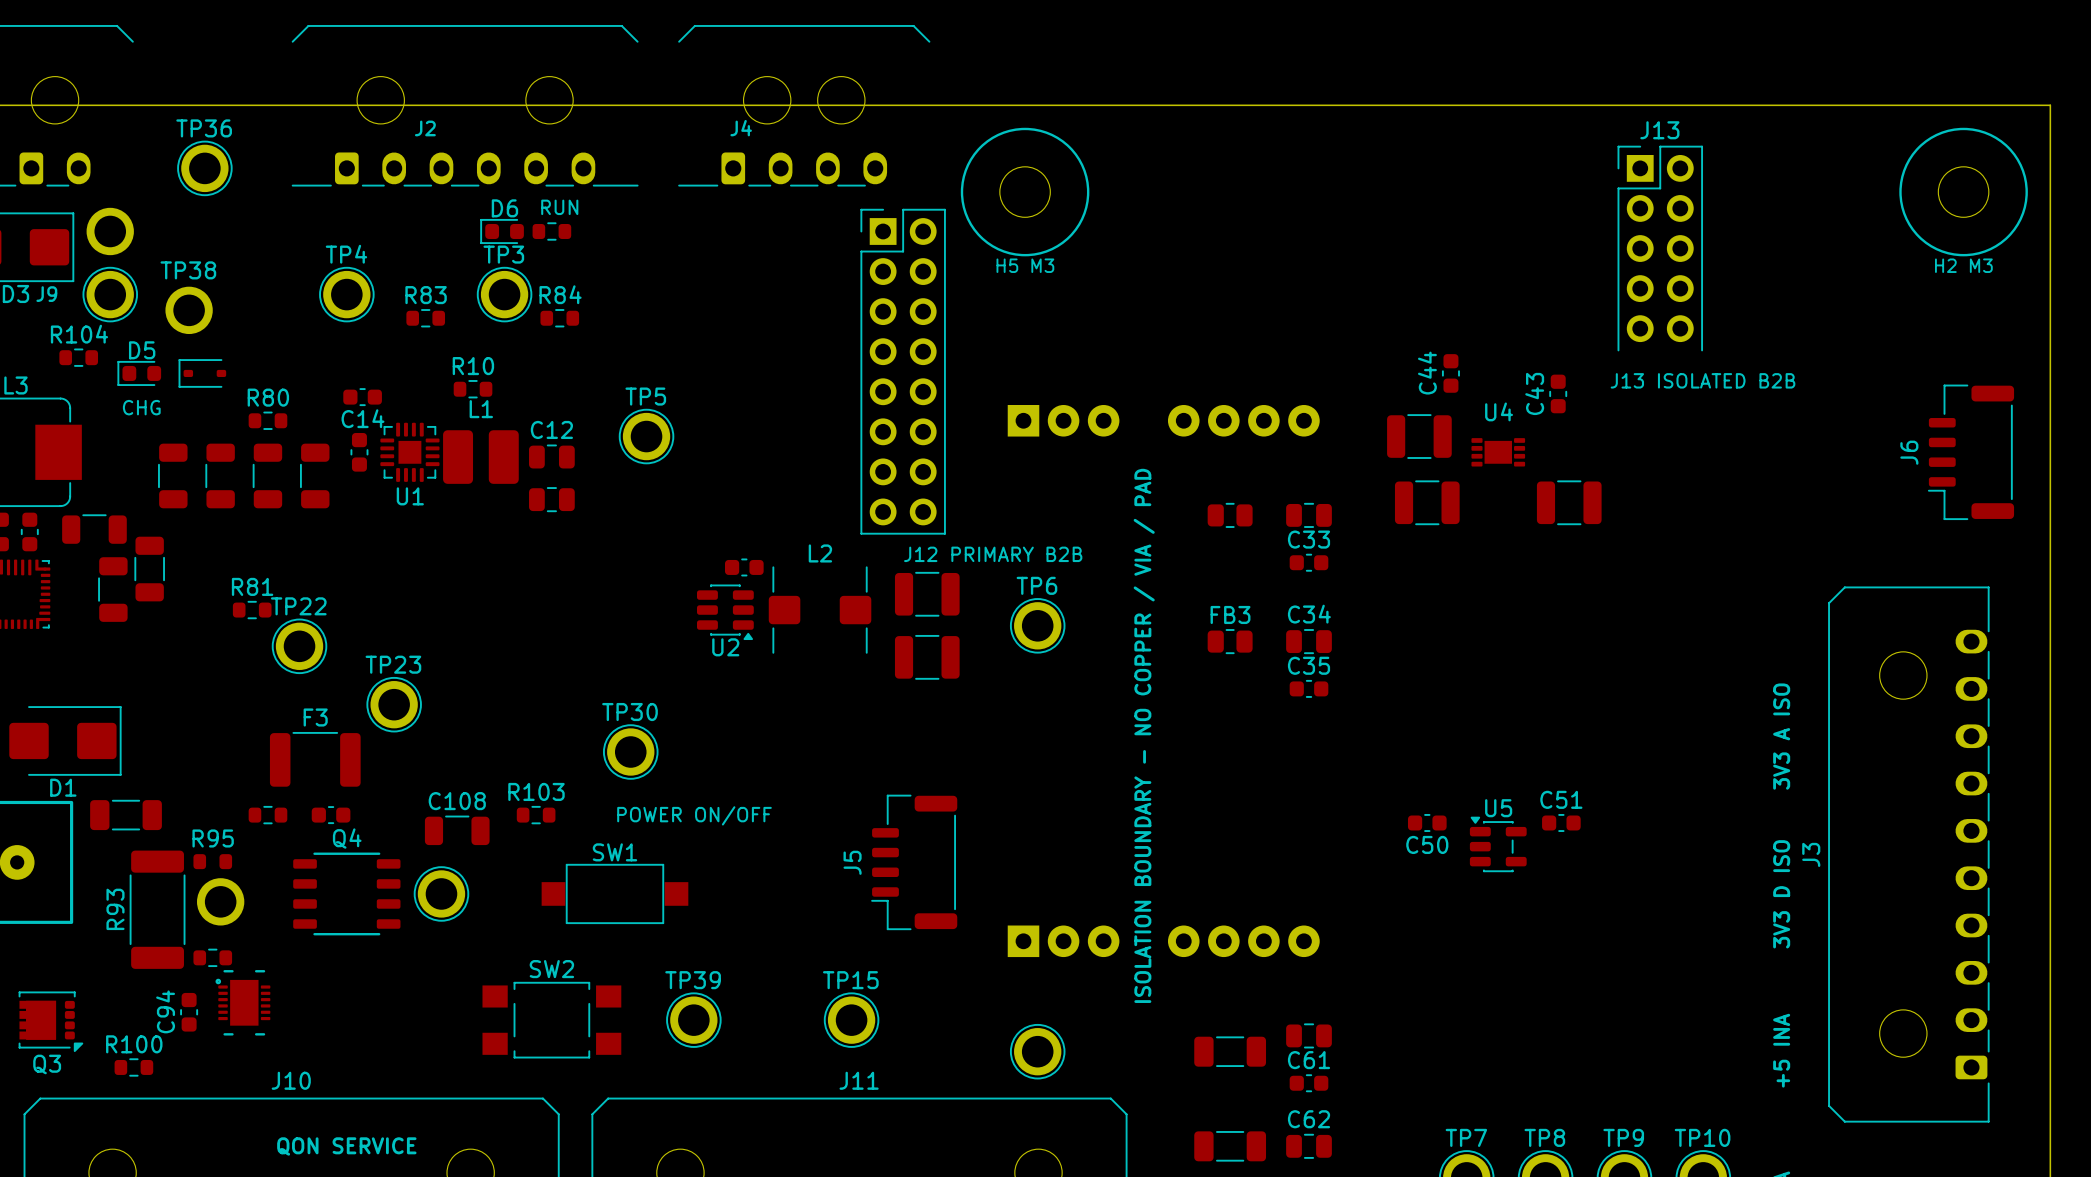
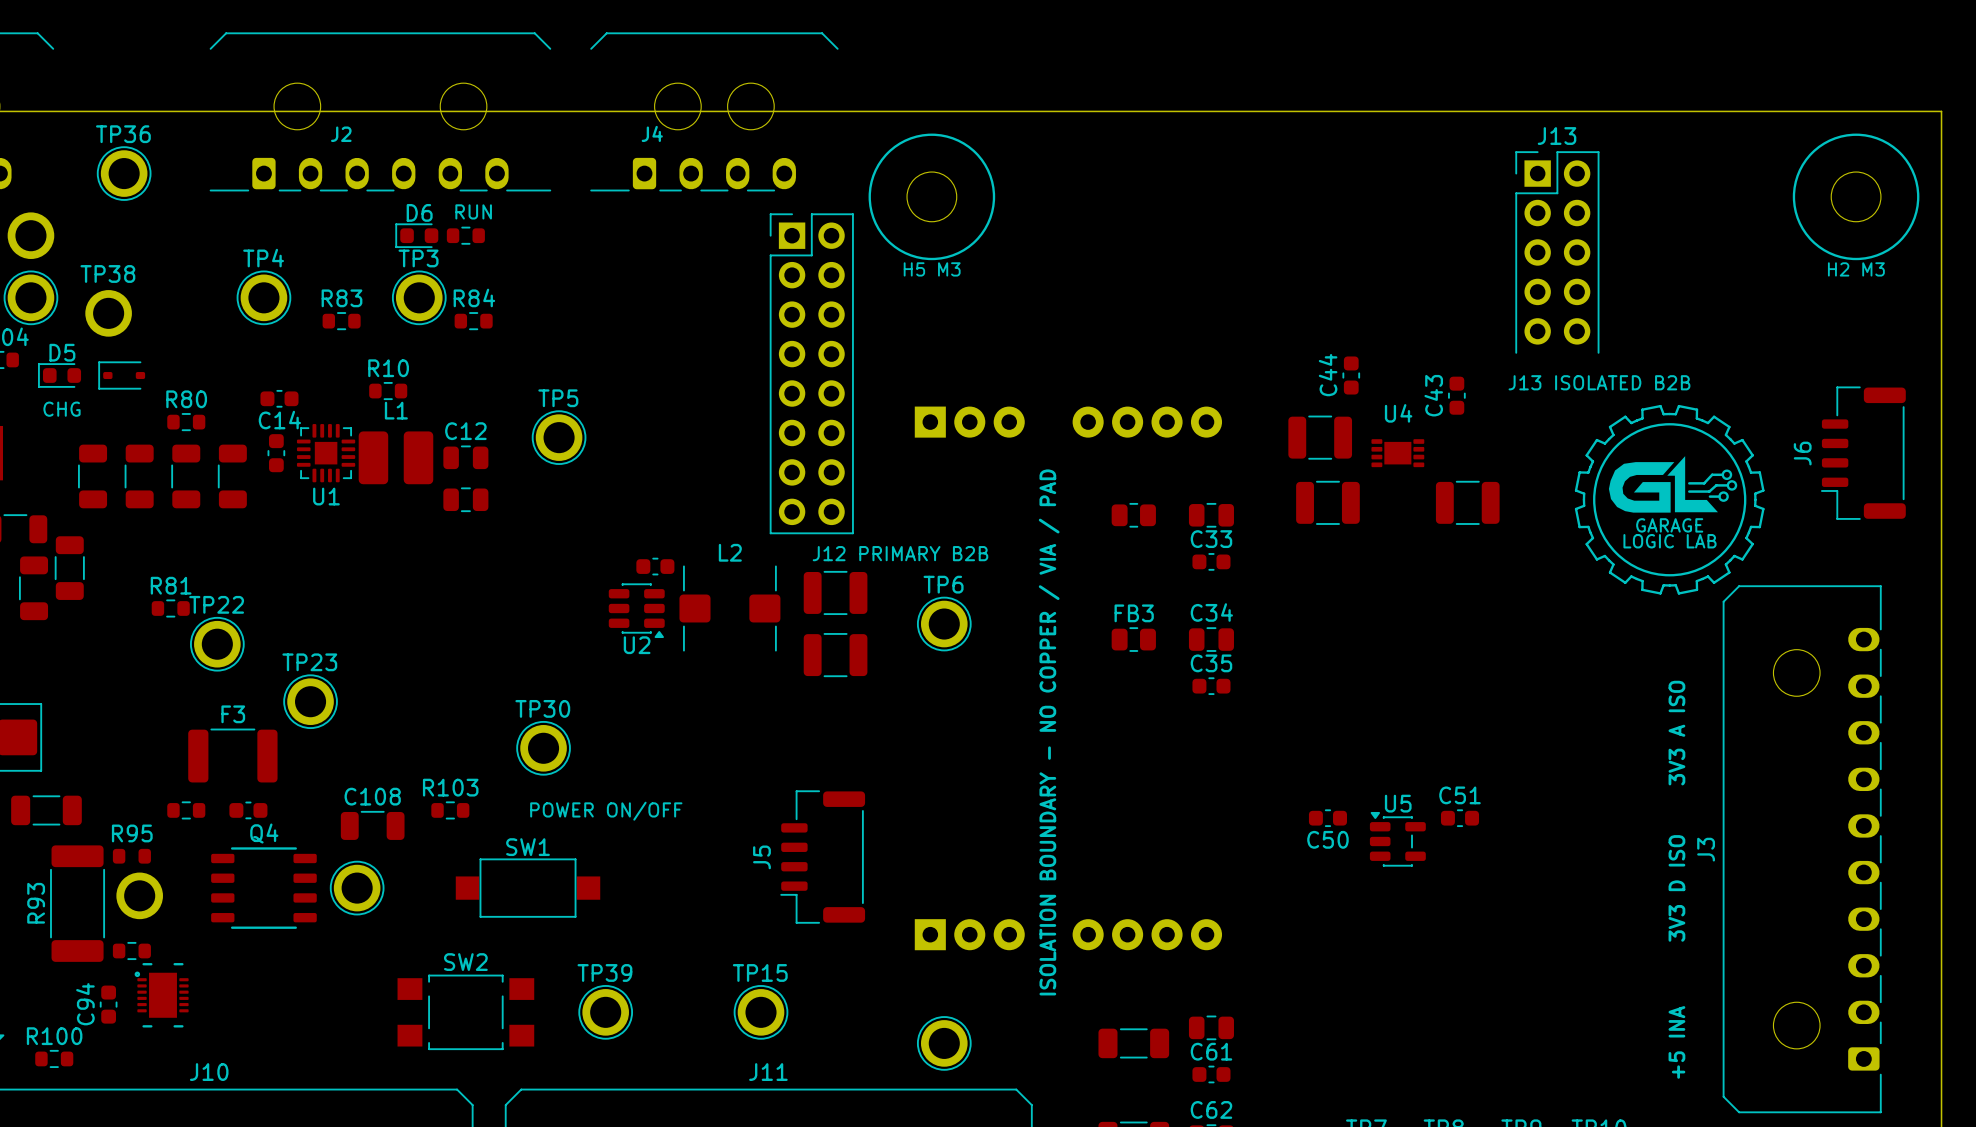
line: none -> (1660, 406) (1642, 409) (1642, 418) (1631, 423) (1625, 416) (1609, 427) (1613, 435) (1604, 443) (1596, 440) (1586, 455) (1592, 461) (1588, 472) (1579, 472) (1576, 490) (1584, 493) (1584, 505) (1576, 508) (1579, 527) (1588, 526) (1592, 538) (1586, 544) (1596, 559) (1604, 555) (1613, 564) (1609, 572) (1625, 582) (1631, 576) (1642, 581) (1642, 589) (1660, 593) (1663, 585) (1675, 585) (1678, 593) (1697, 589) (1696, 581) (1708, 576) (1714, 582) (1729, 572) (1725, 564) (1734, 555) (1742, 559) (1752, 544) (1746, 538) (1751, 526) (1759, 527) (1763, 508) (1755, 505) (1755, 493) (1763, 490) (1759, 472) (1751, 472) (1746, 461) (1752, 455) (1742, 440) (1734, 443) (1725, 435) (1729, 427) (1714, 416) (1708, 423) (1696, 418) (1697, 409) (1678, 406) (1675, 414) (1663, 414) (1660, 406)
drawing: none -> [1593, 423, 1747, 577]
line: none -> (1722, 474) (1712, 474) (1704, 483) (1689, 483)
line: none -> (1727, 485) (1716, 485) (1709, 491) (1689, 491)
line: none -> (1709, 496) (1719, 496)
text: none -> GARAGE (1669, 525)
text: none -> LOGIC LAB (1669, 541)

